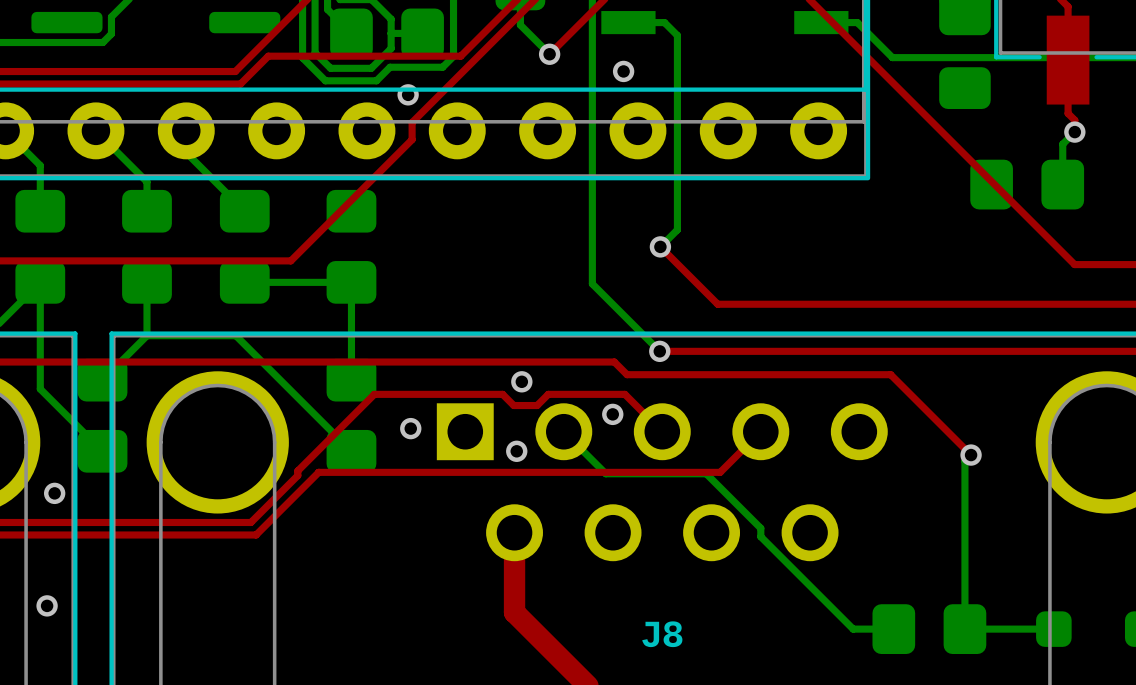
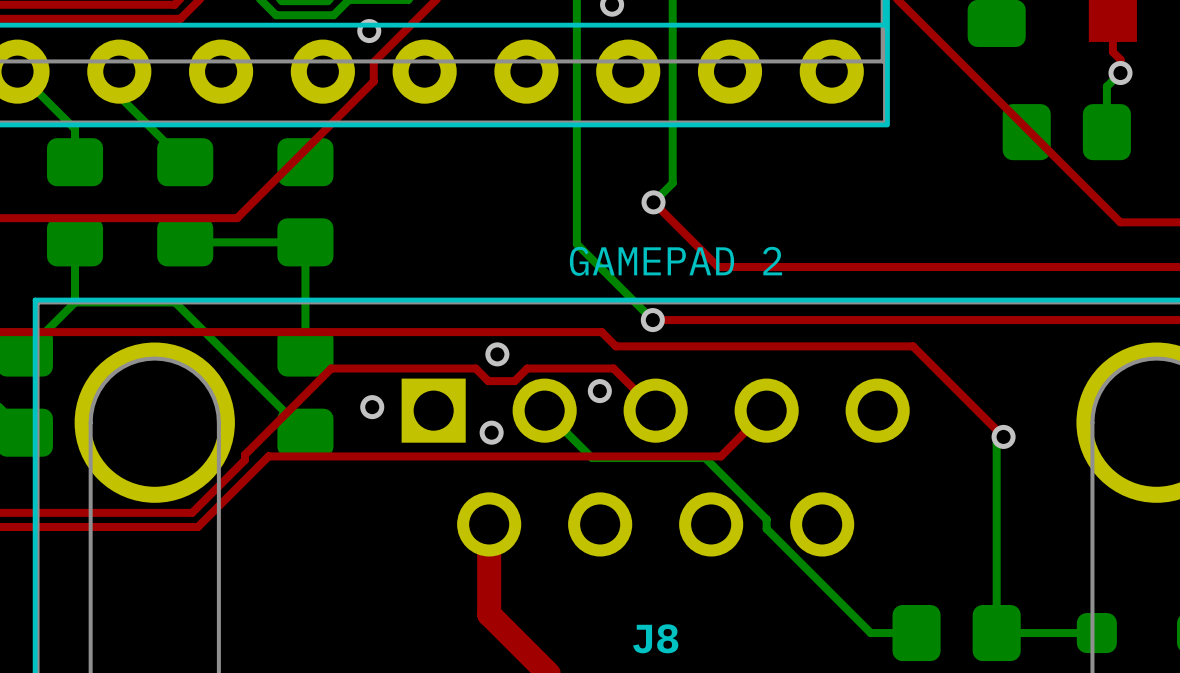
text: none -> GAMEPAD 2 (675, 261)

